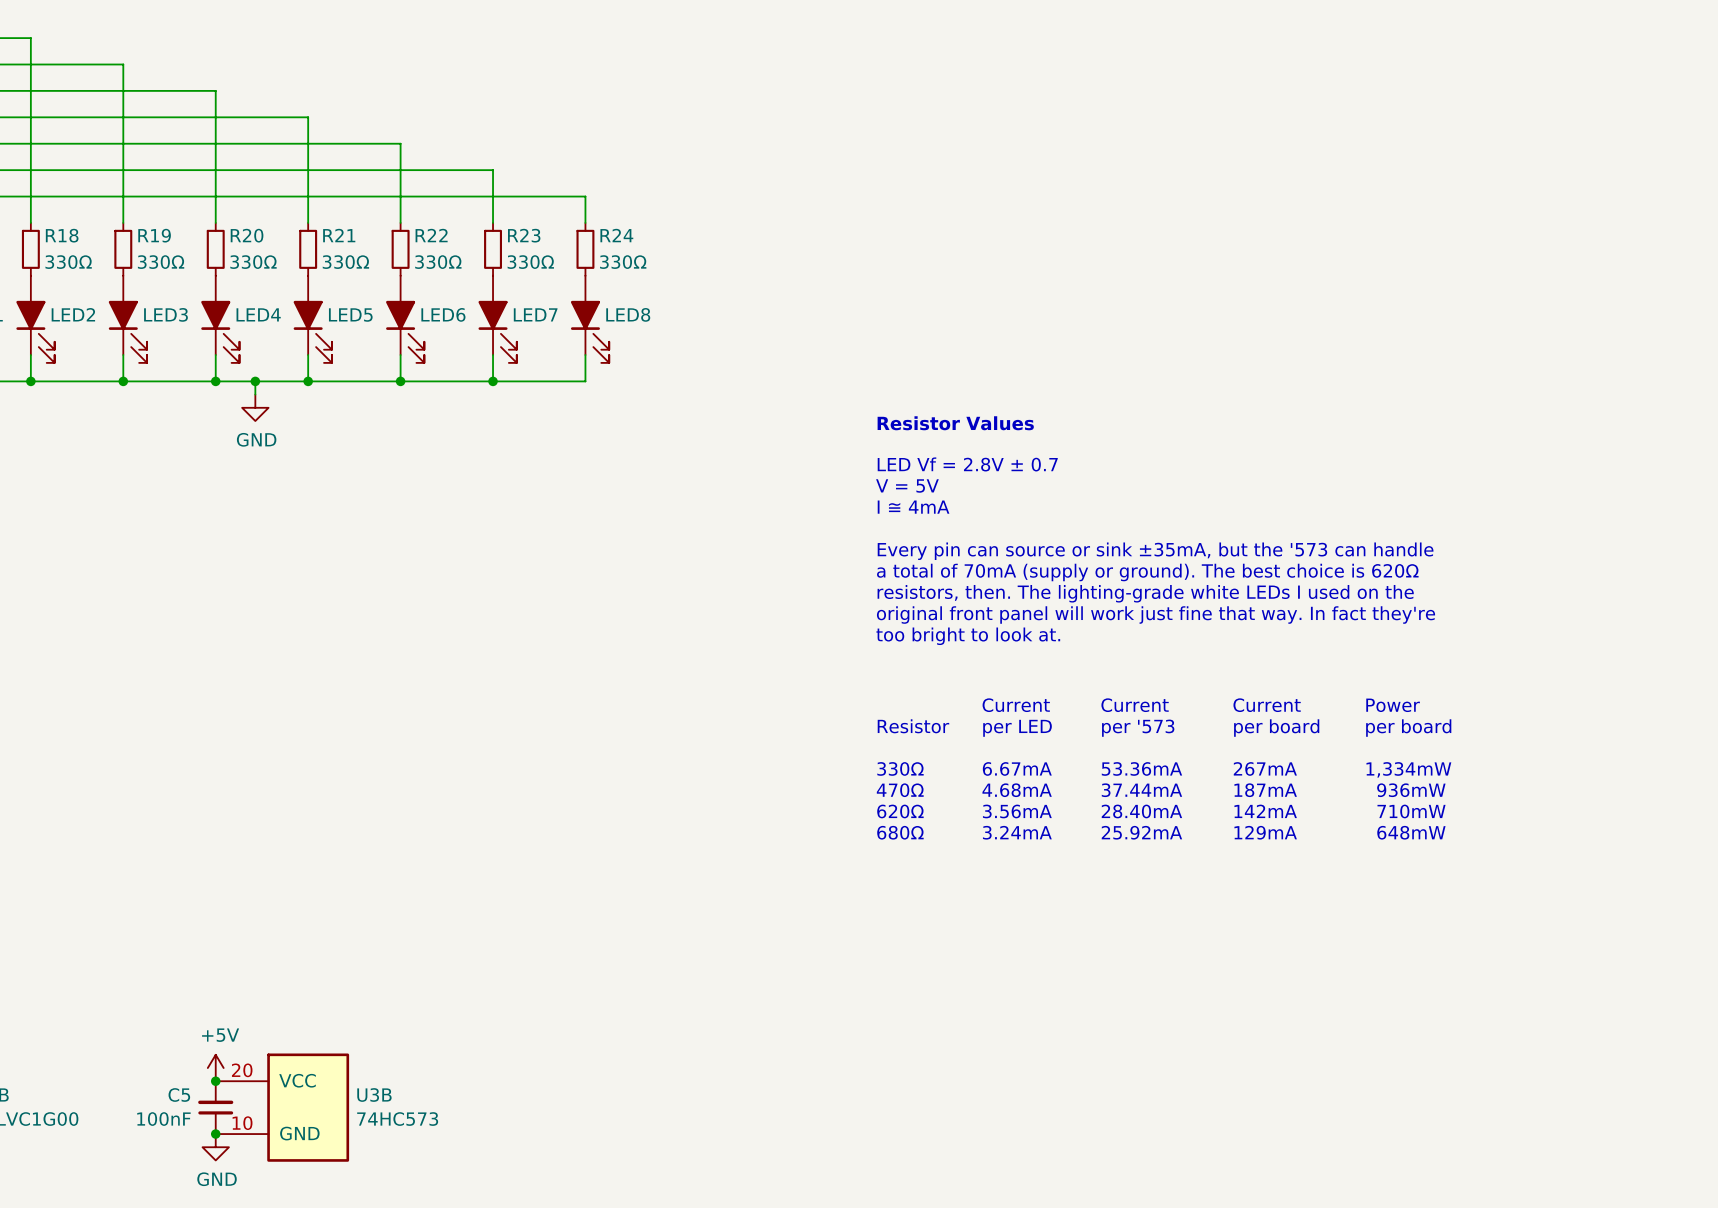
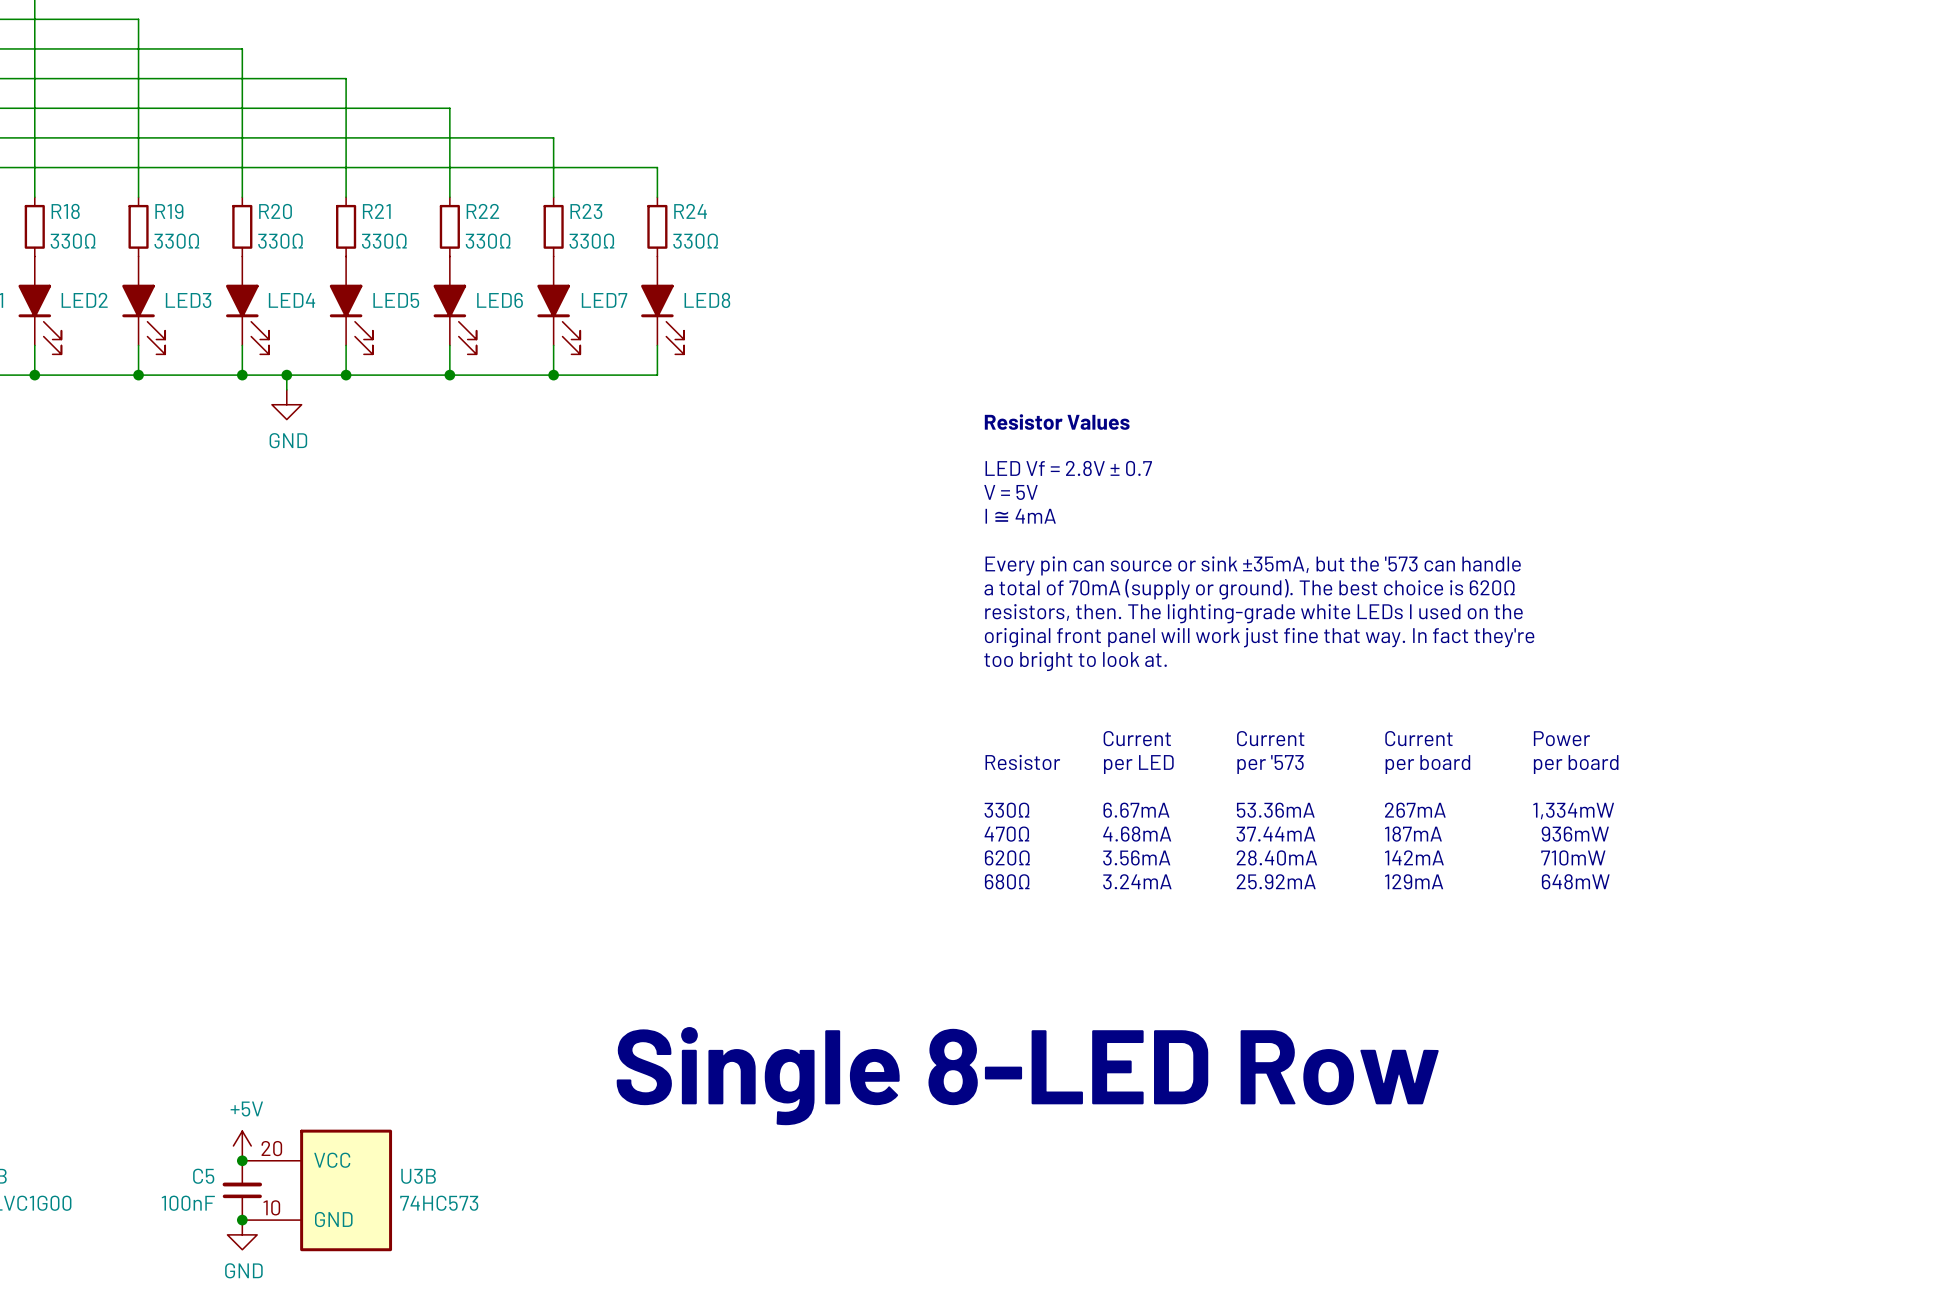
text: none -> Single 8-LED Row (1027, 1076)

